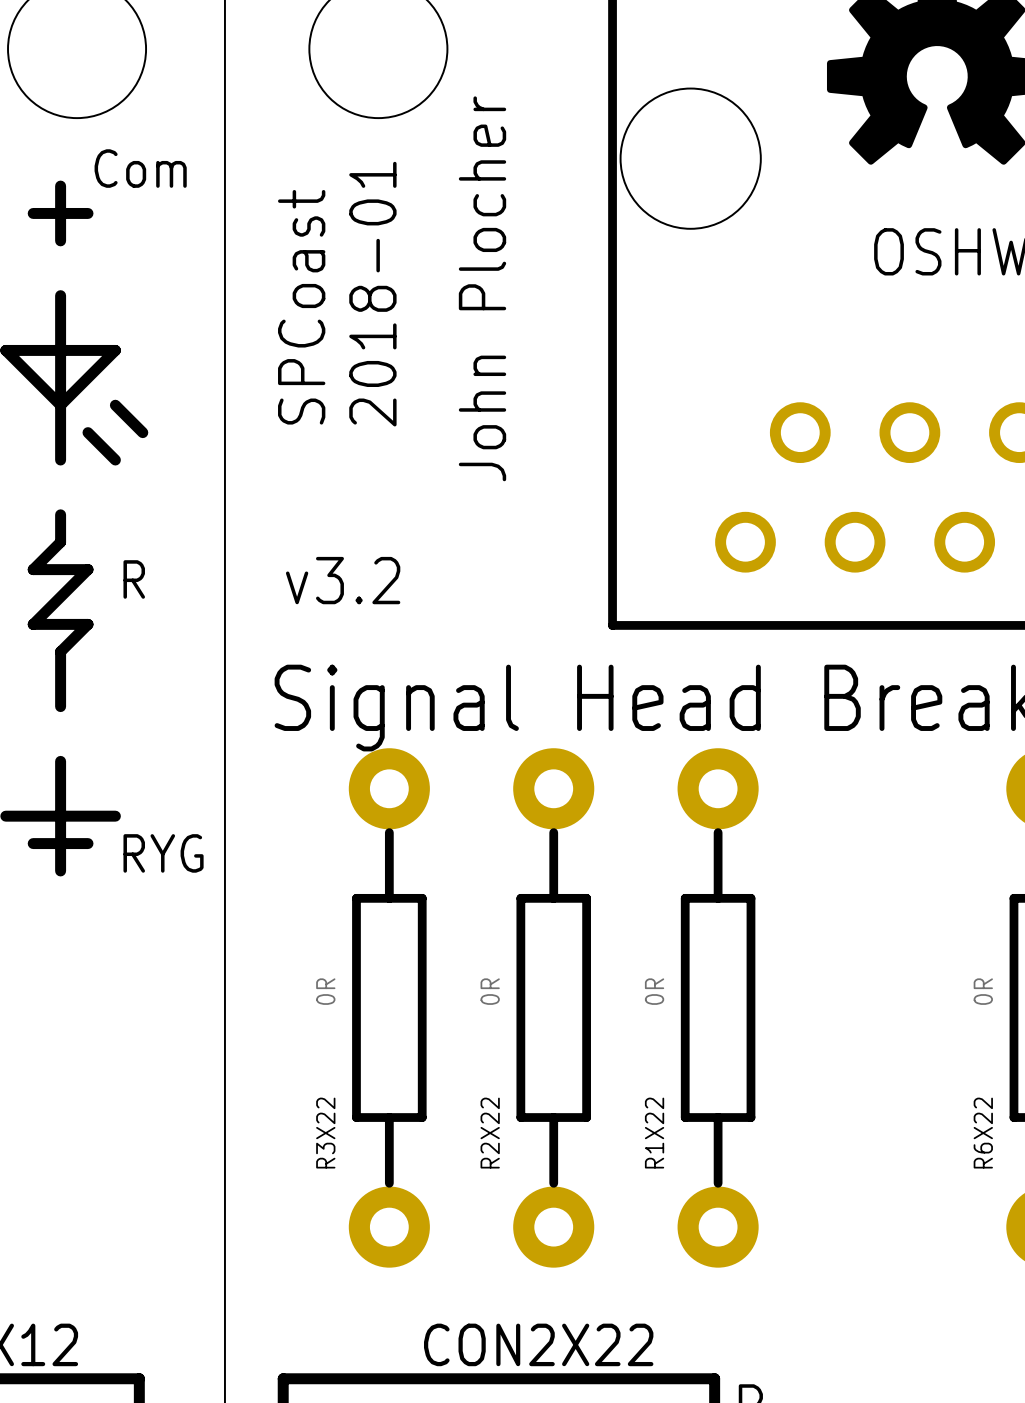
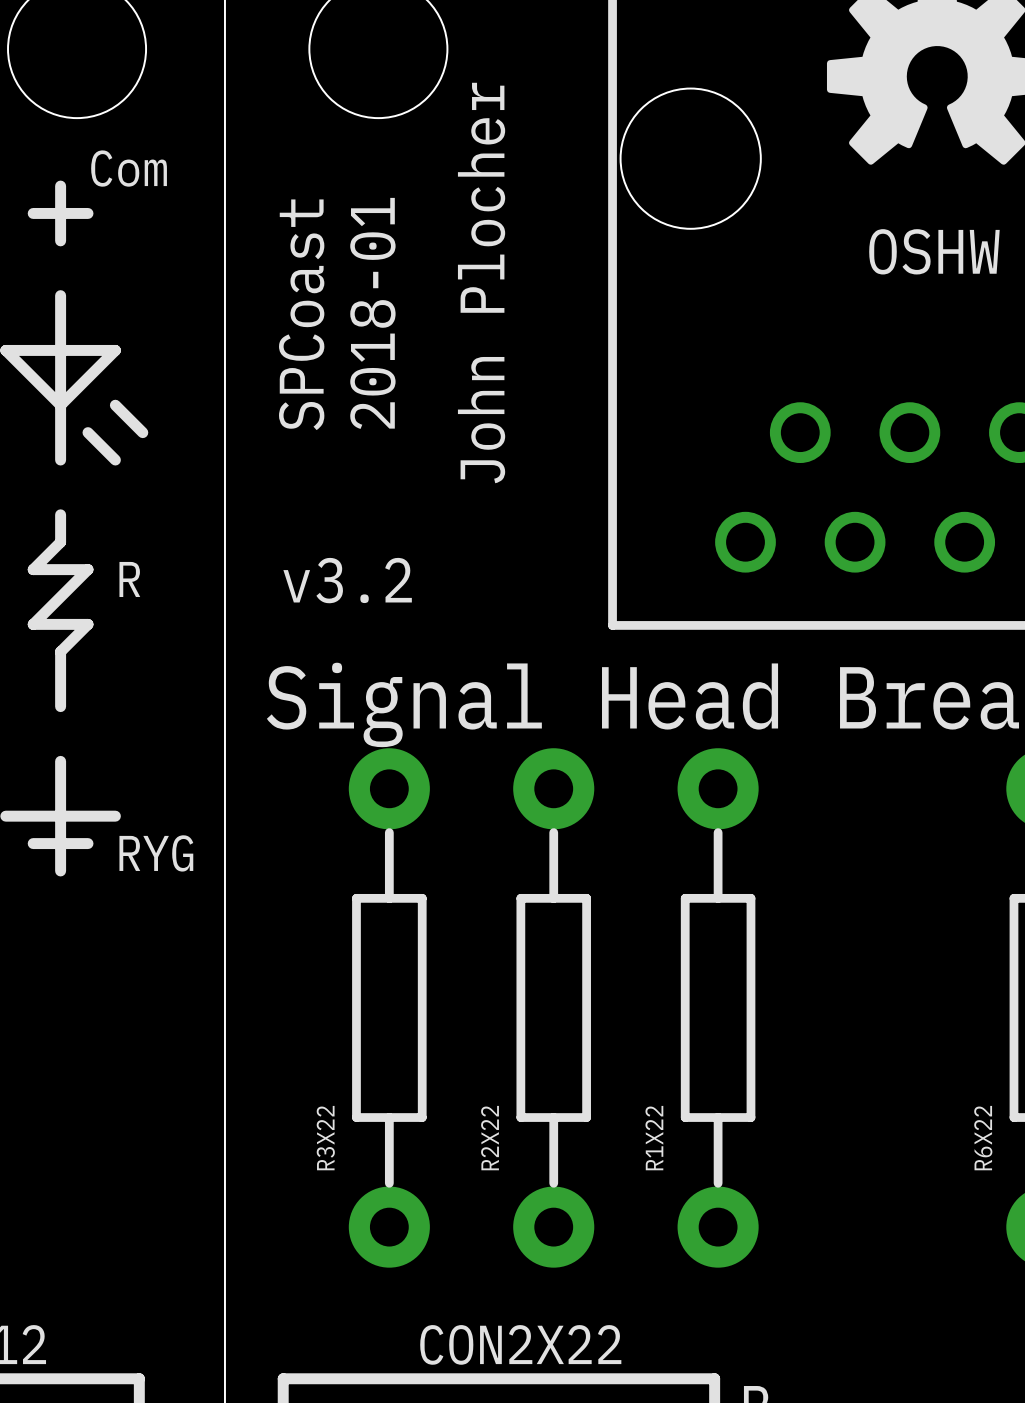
R3X22 value: 0R (325, 991) -> none
R2X22 value: 0R (490, 991) -> none
R1X22 value: 0R (654, 991) -> none
R6X22 value: 0R (983, 991) -> none

